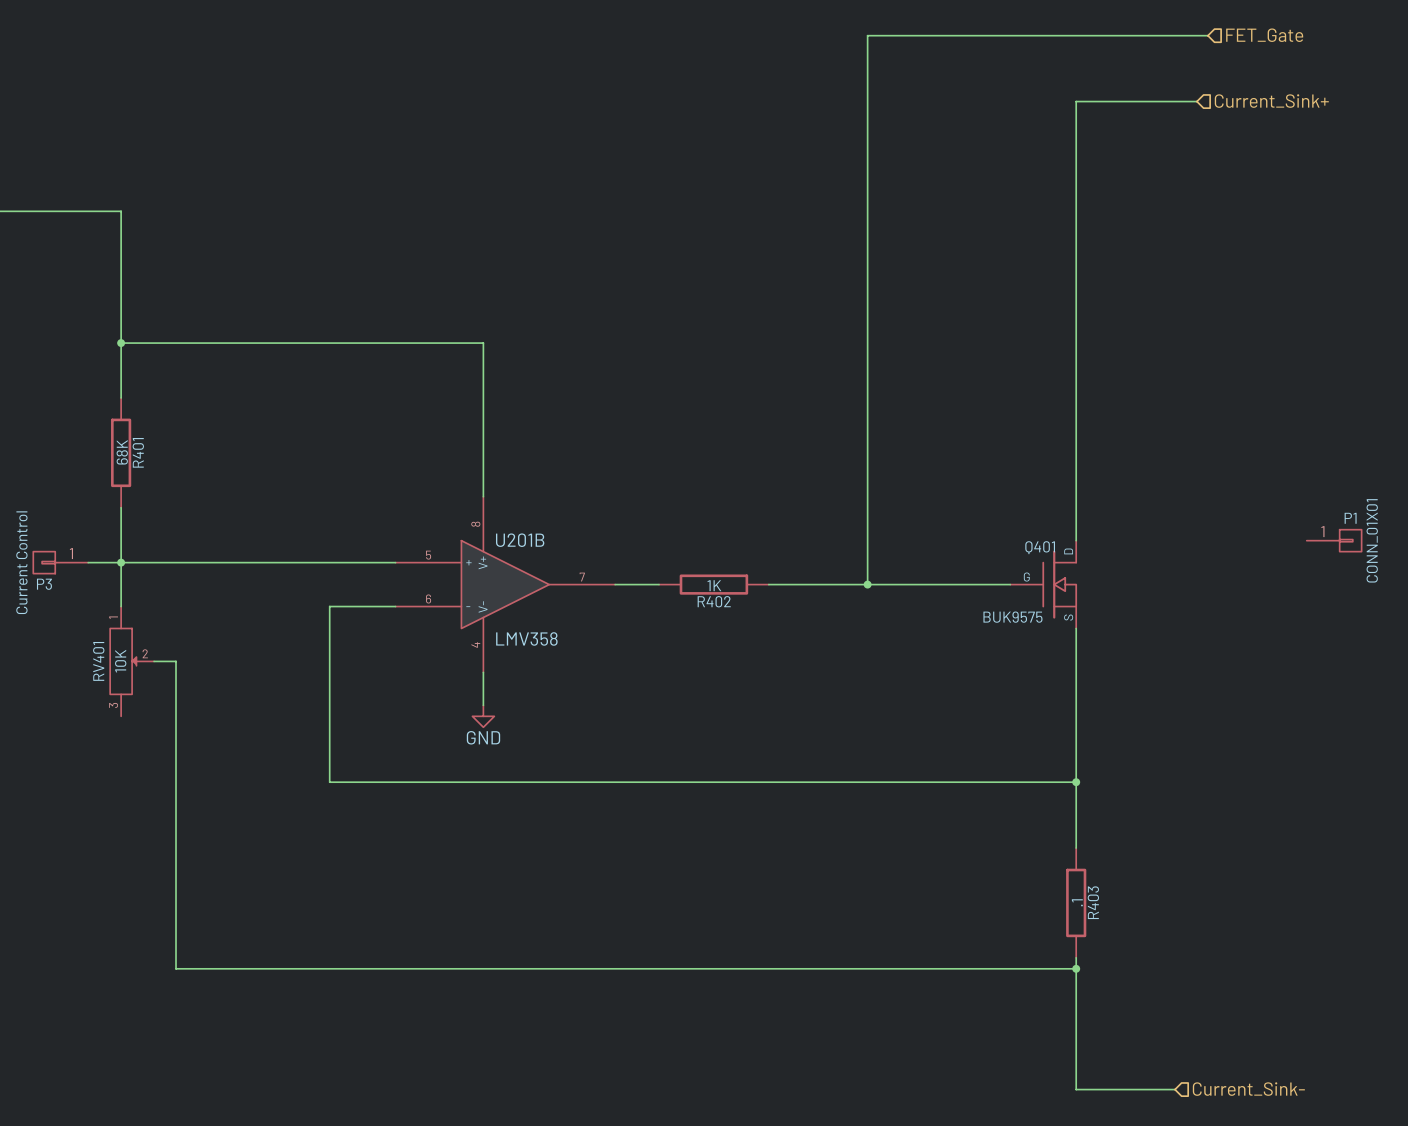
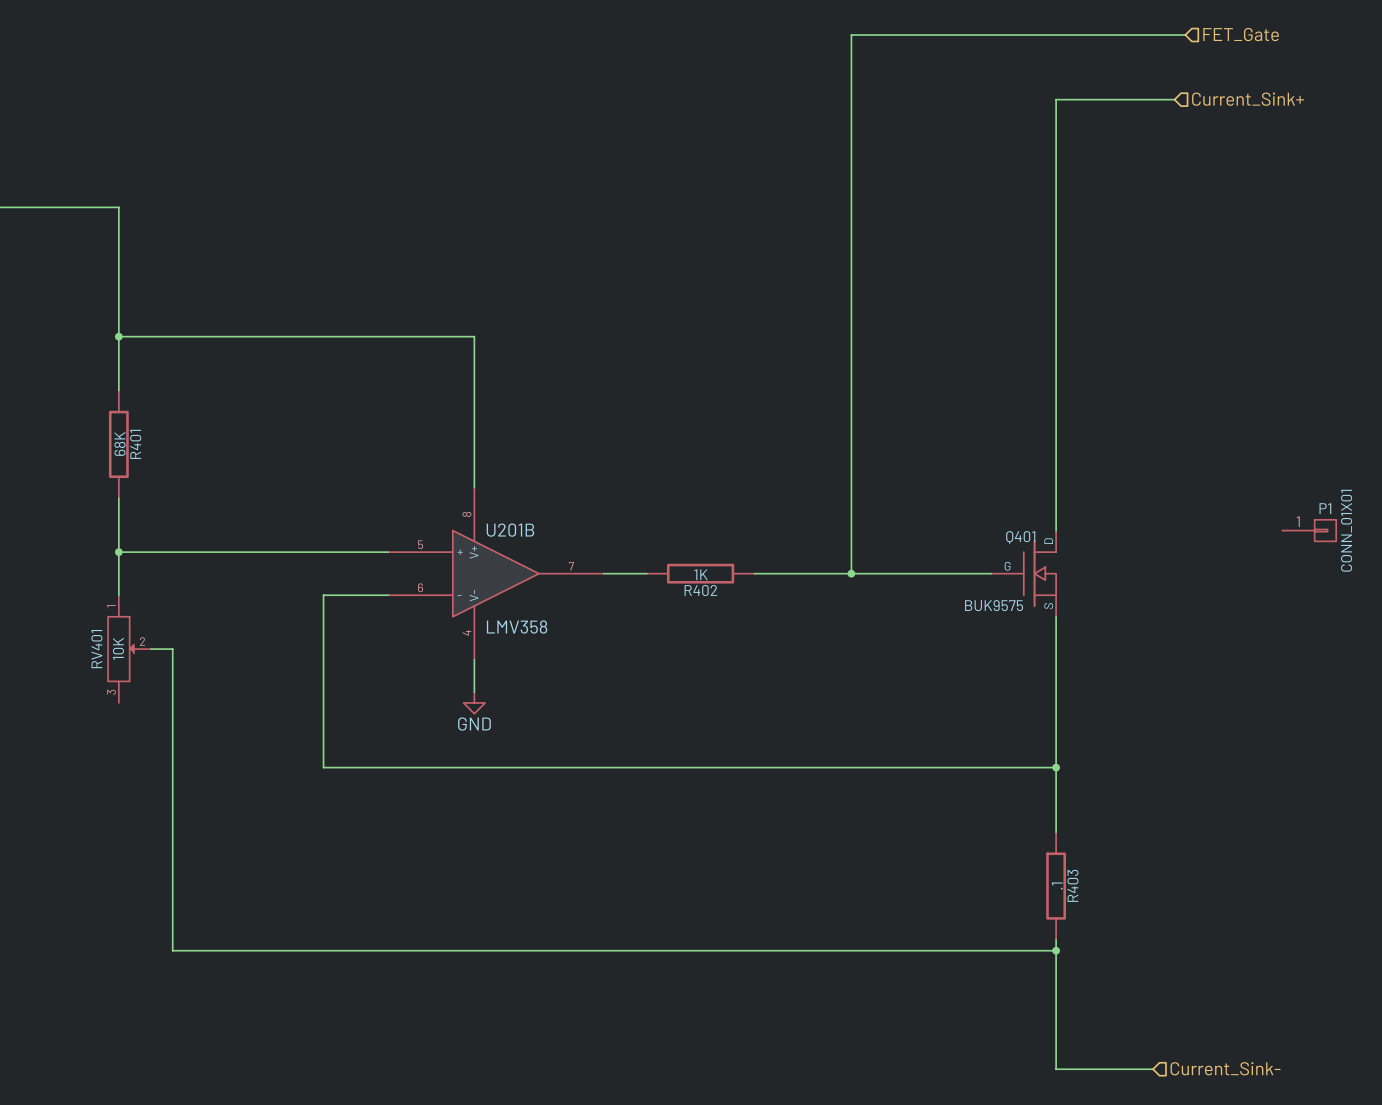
P3: Current Control (60, 562) -> none
wire: (88, 562) (121, 562) -> none

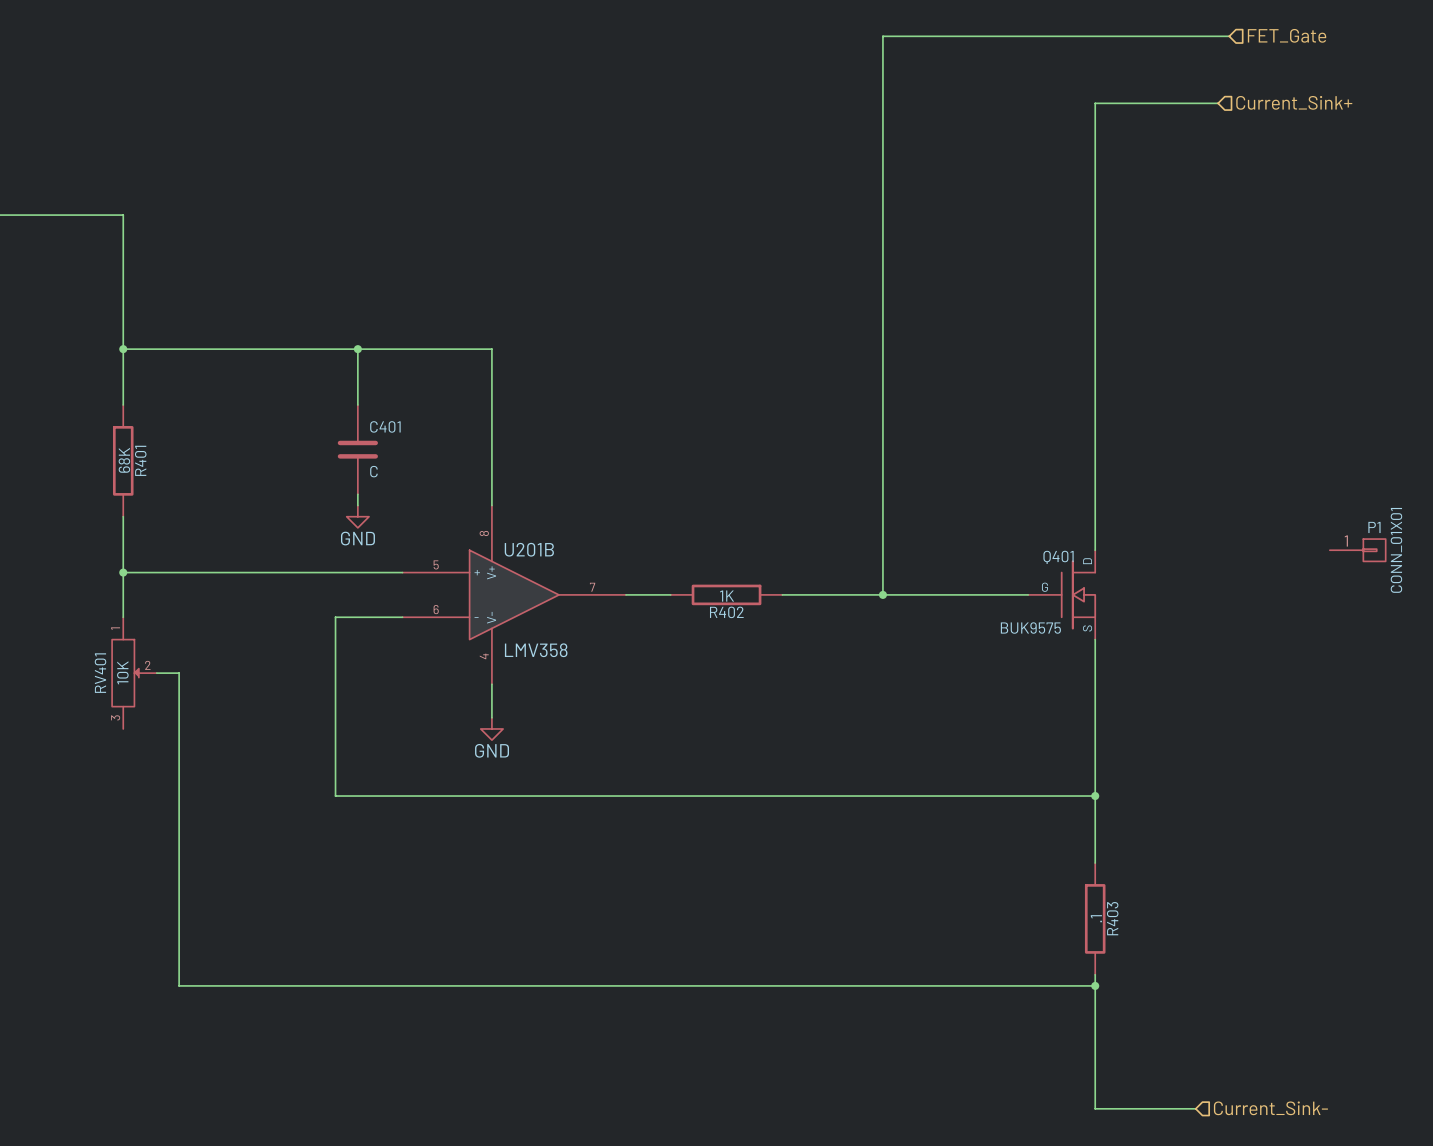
wire: none -> (357, 349) (357, 404)
junction: none -> (357, 349)
C401: none -> C (357, 449)
wire: none -> (357, 494) (357, 505)
power symbol: none -> GND (357, 516)

